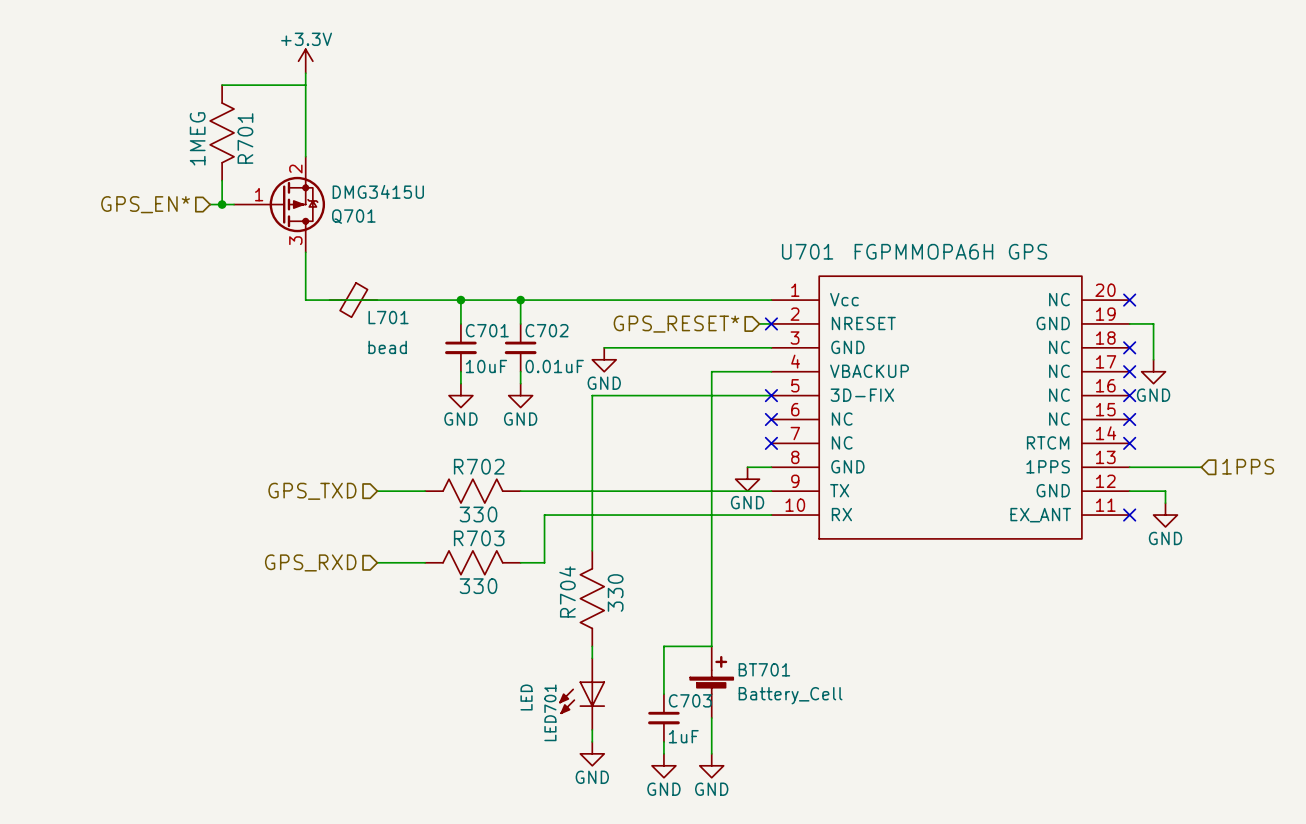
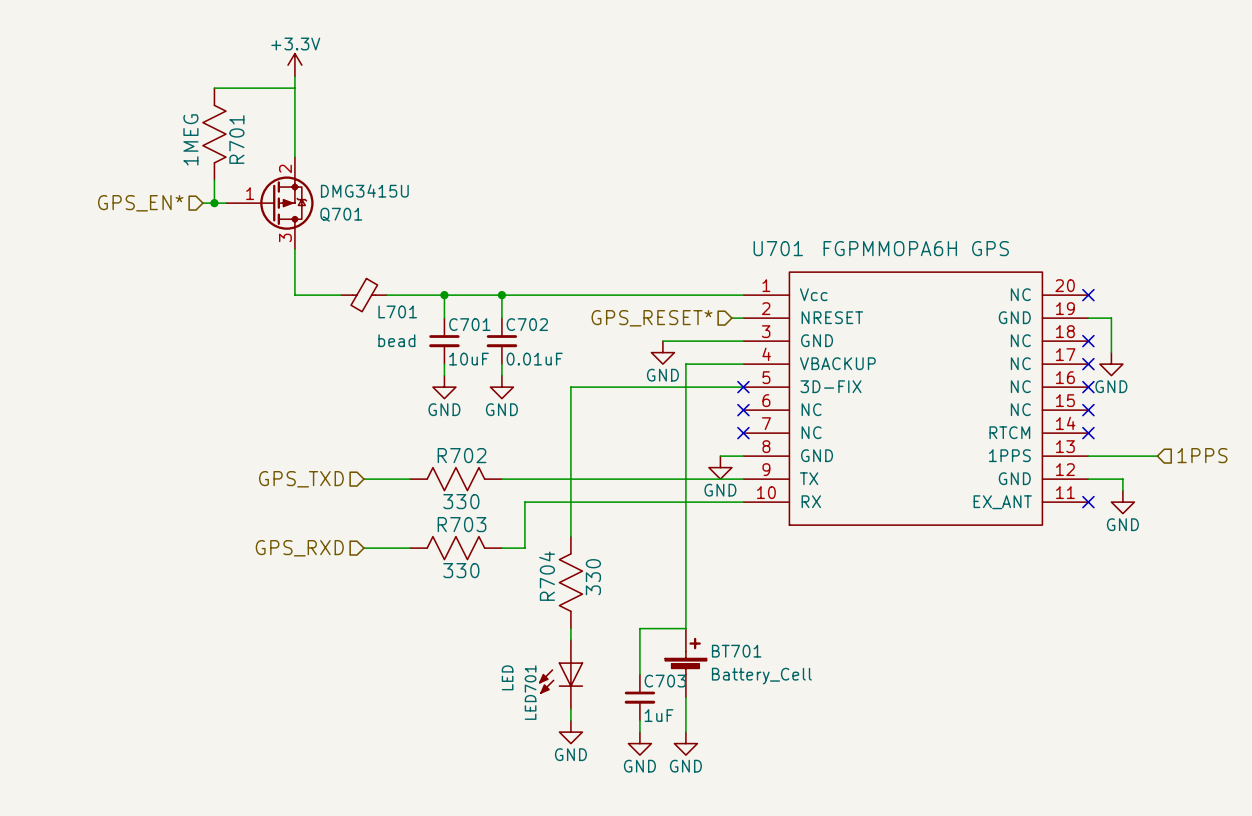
L701 position: (353, 300) -> (363, 295)
no-connect mark: (771, 323) -> none
wire: (604, 347) (687, 347) -> none
power symbol position: GND (604, 359) -> GND (662, 352)

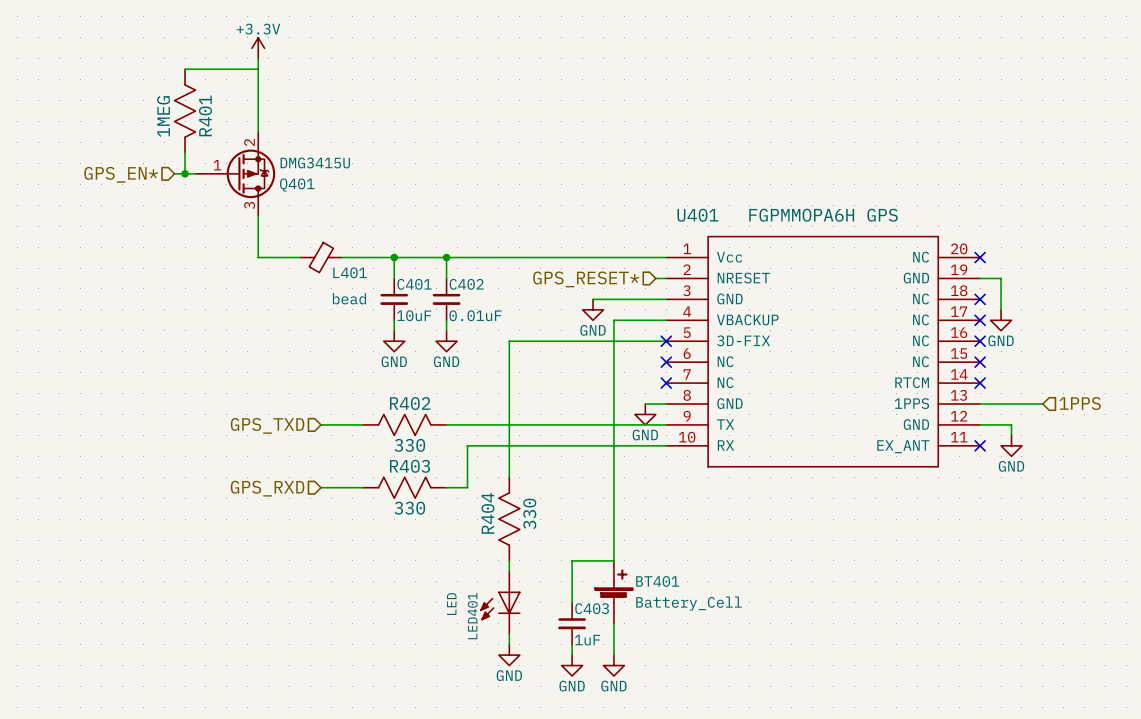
R701 name: R701 (236, 139) -> R401 (205, 115)
Q701 name: Q701 (341, 214) -> Q401 (297, 185)
U701 name: U701 (778, 248) -> U401 (697, 215)
L701 name: L701 (397, 311) -> L401 (350, 272)
C701 name: C701 (469, 324) -> C401 (414, 284)
C702 name: C702 (527, 324) -> C402 (466, 284)
R702 name: R702 (462, 455) -> R402 (410, 403)
R703 name: R703 (462, 524) -> R403 (410, 466)
R704 name: R704 (547, 576) -> R404 (487, 513)
BT701 name: BT701 (736, 651) -> BT401 (657, 581)
C703 name: C703 (665, 681) -> C403 (592, 608)
LED701 name: LED701 (530, 692) -> LED401 (472, 616)

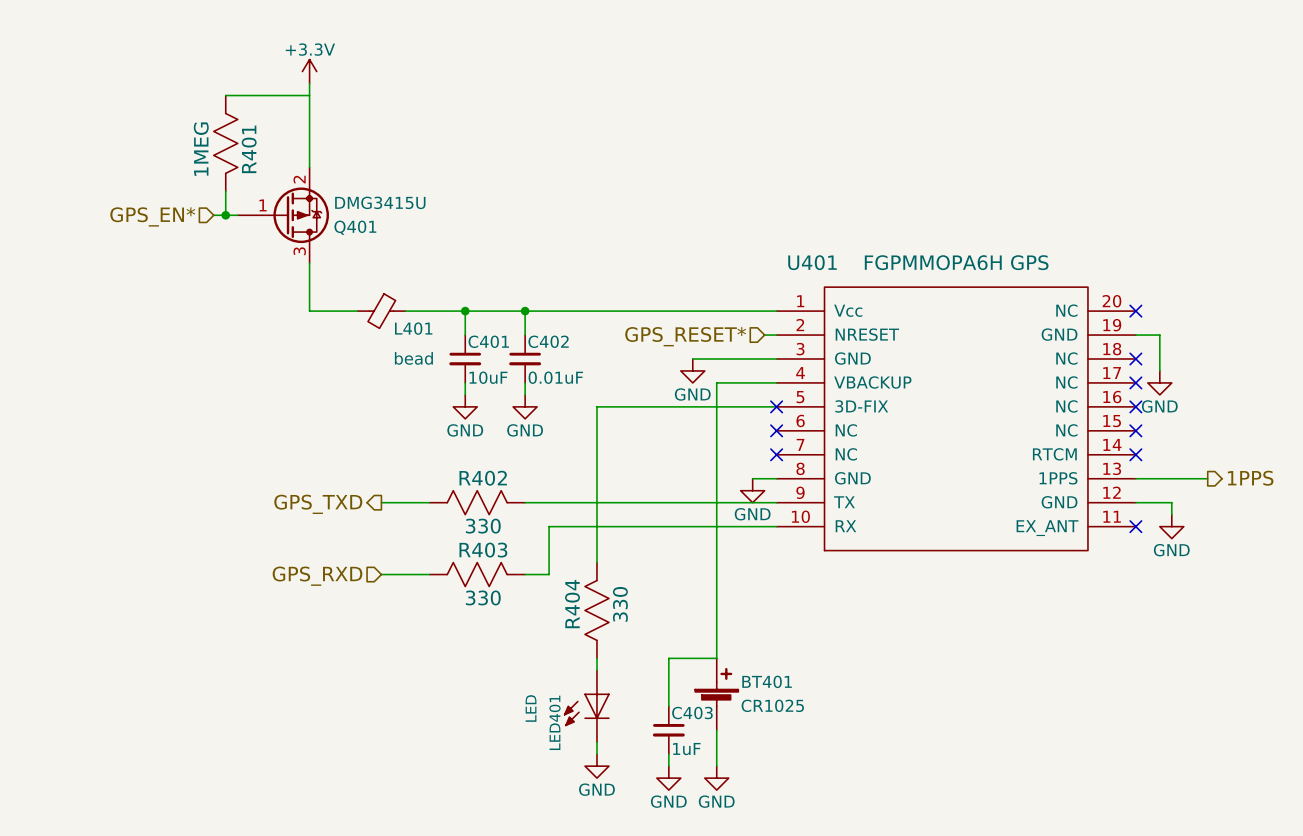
hierarchical label shape: input (1080, 403) -> output (1250, 478)
hierarchical label shape: input (267, 425) -> output (318, 504)
BT401 value: Battery_Cell (688, 603) -> CR1025 (772, 705)

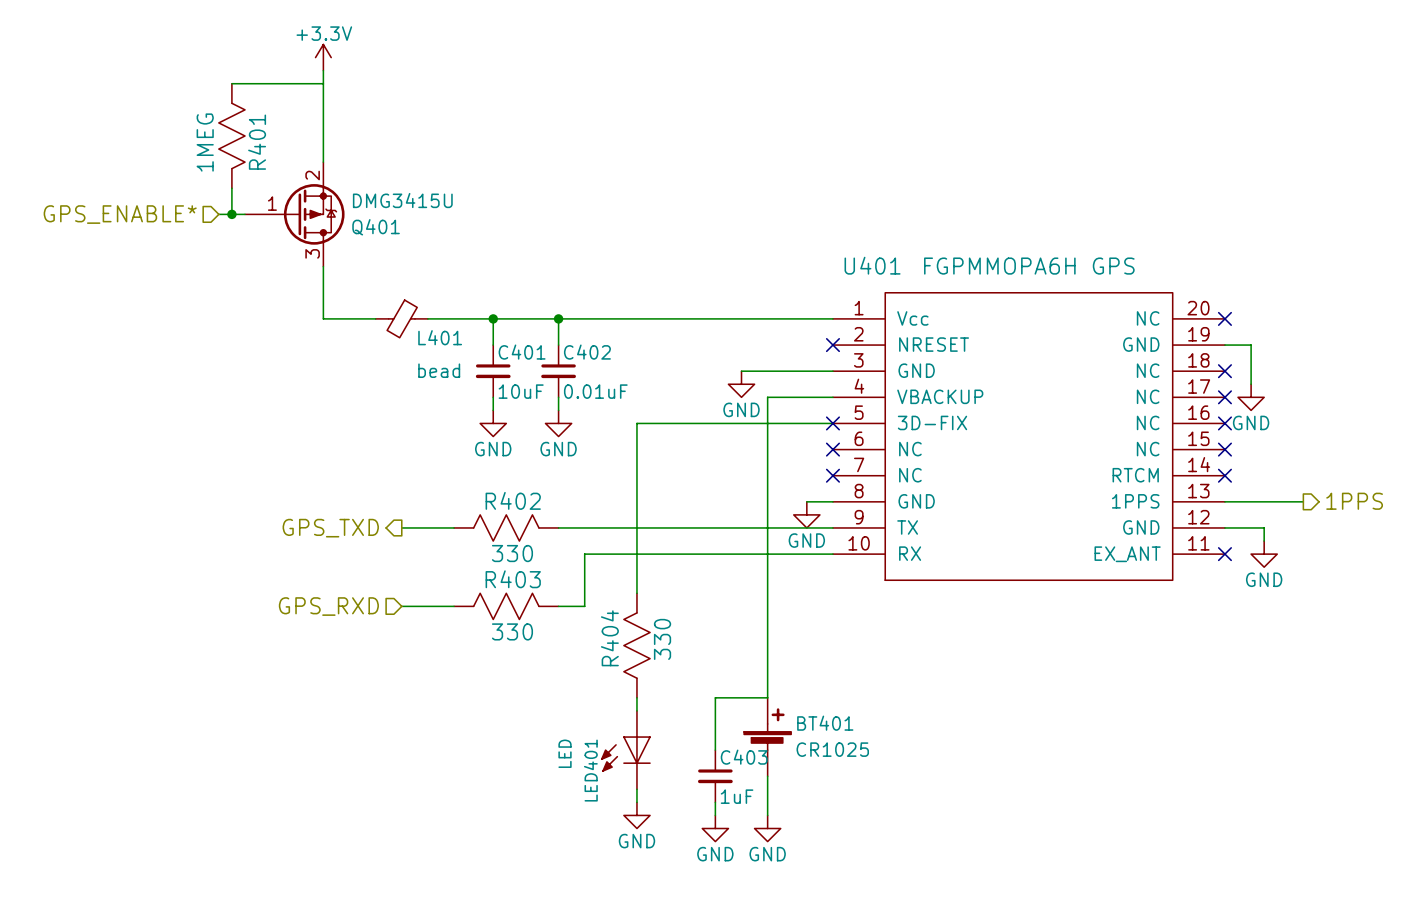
hierarchical label: GPS_EN* (152, 216) -> GPS_ENABLE* (120, 214)
wire: (764, 335) (776, 335) -> none
no-connect mark: none -> (832, 345)
hierarchical label: GPS_RESET* (685, 336) -> none

